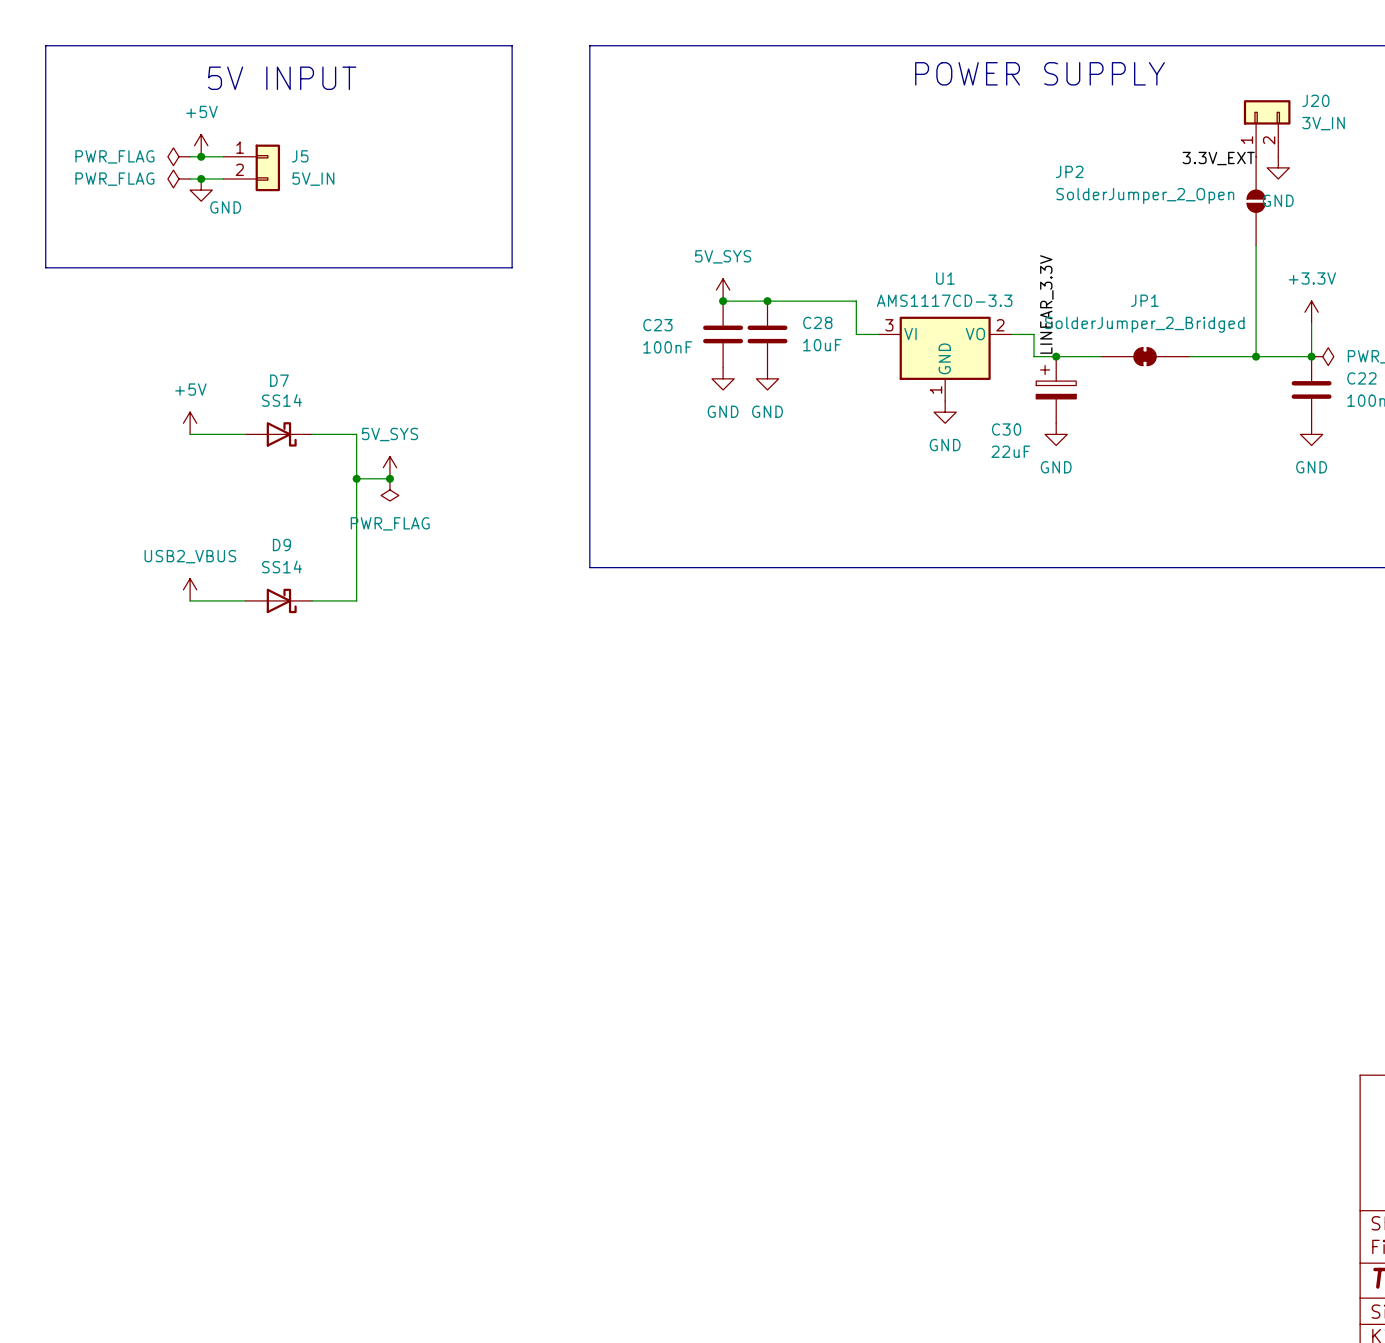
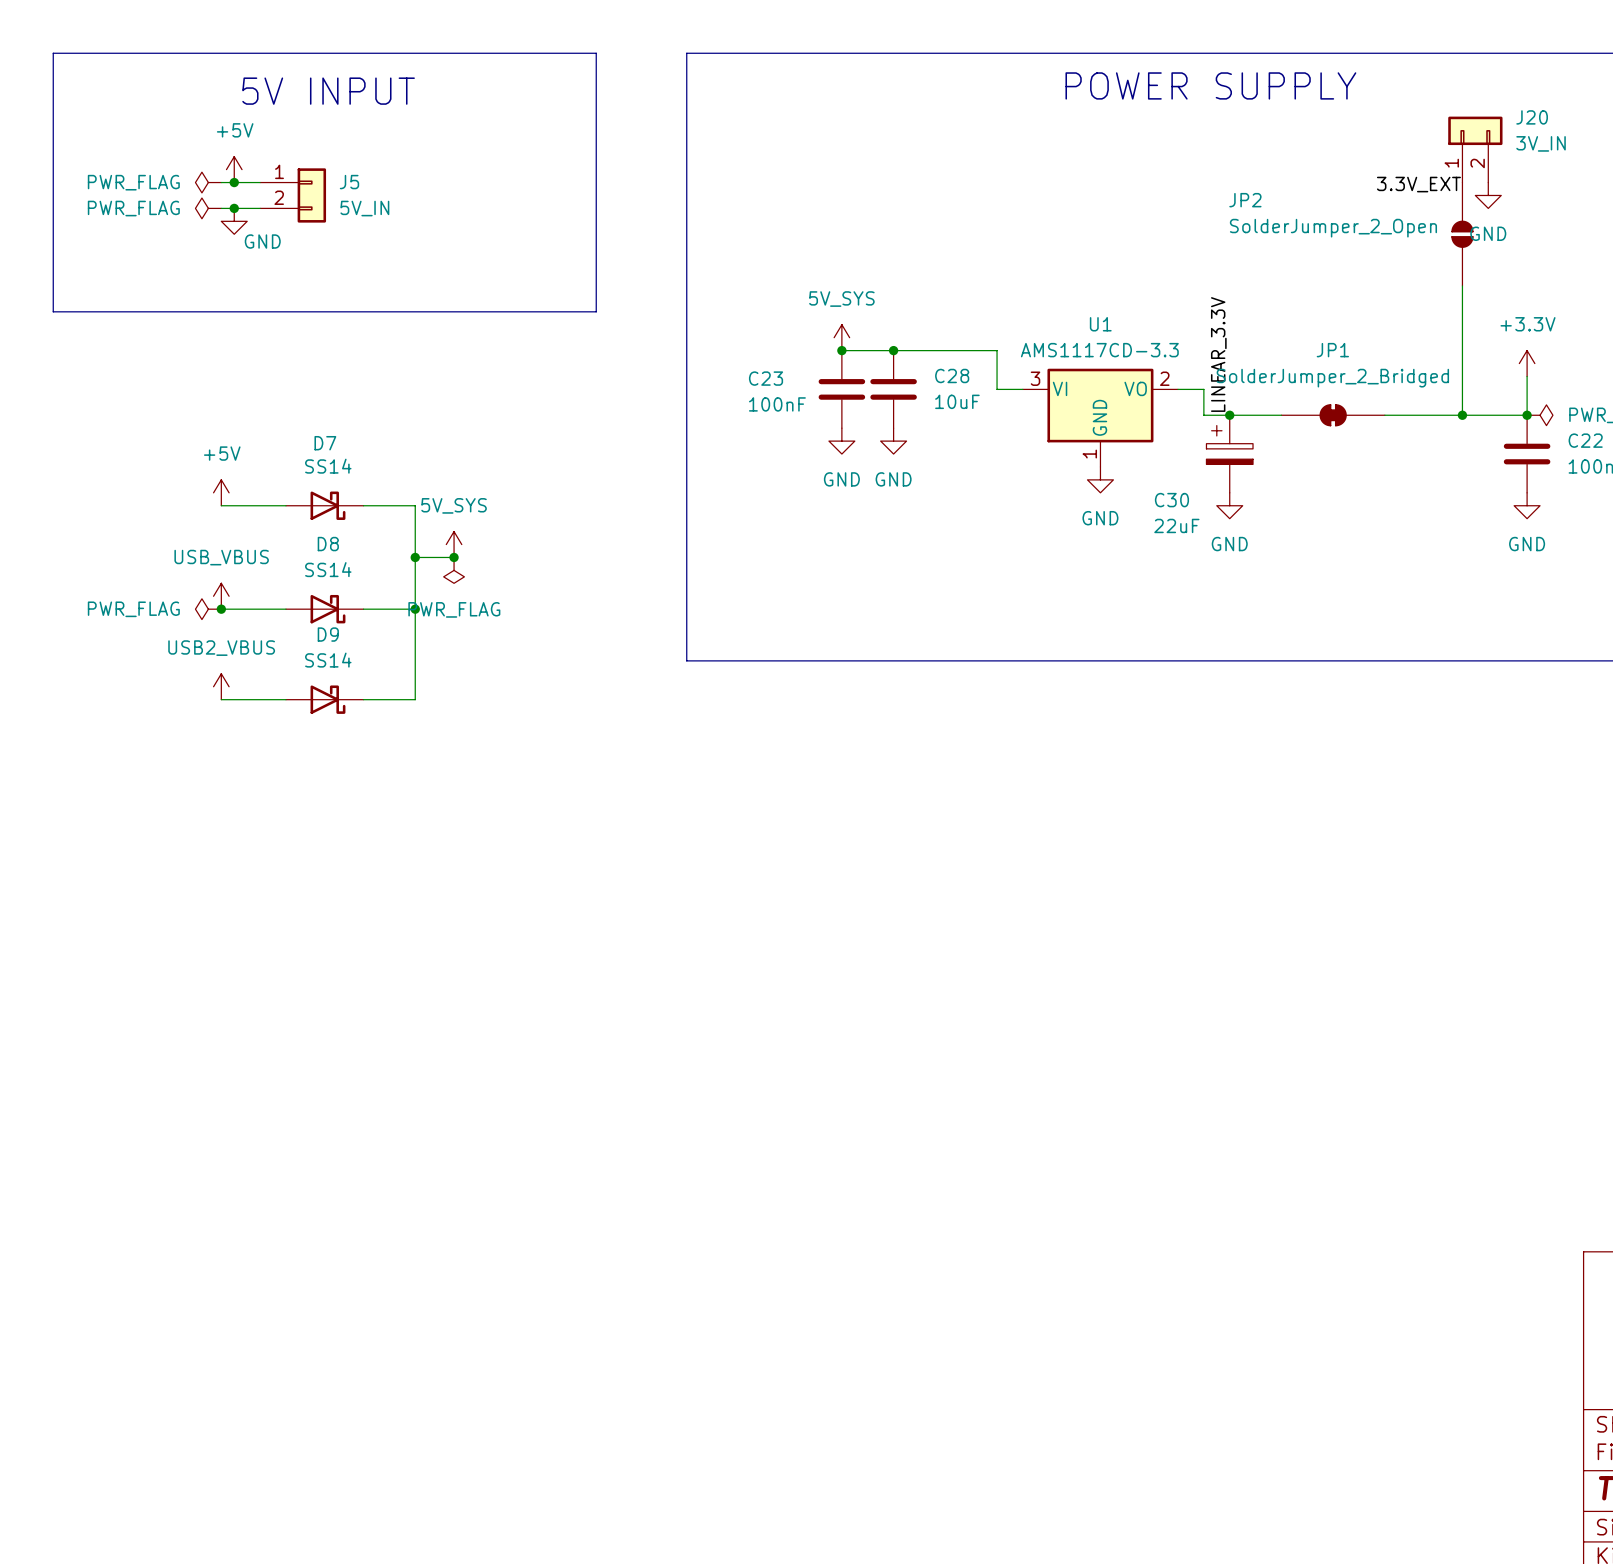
power symbol: none -> USB_VBUS (221, 596)
power symbol: none -> PWR_FLAG (208, 609)
wire: none -> (221, 609) (285, 609)
junction: none -> (221, 609)
D8: none -> SS14 (324, 609)
wire: none -> (363, 609) (415, 609)
junction: none -> (415, 609)

